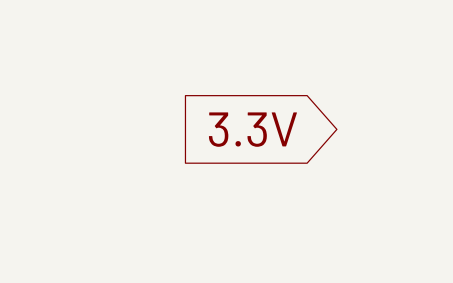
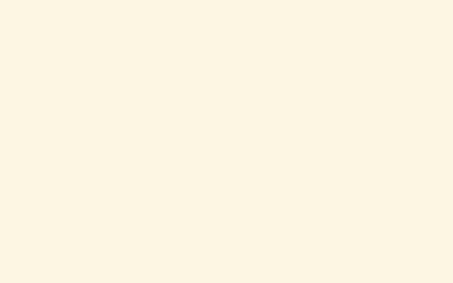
global label: 3.3V (252, 129) -> none

